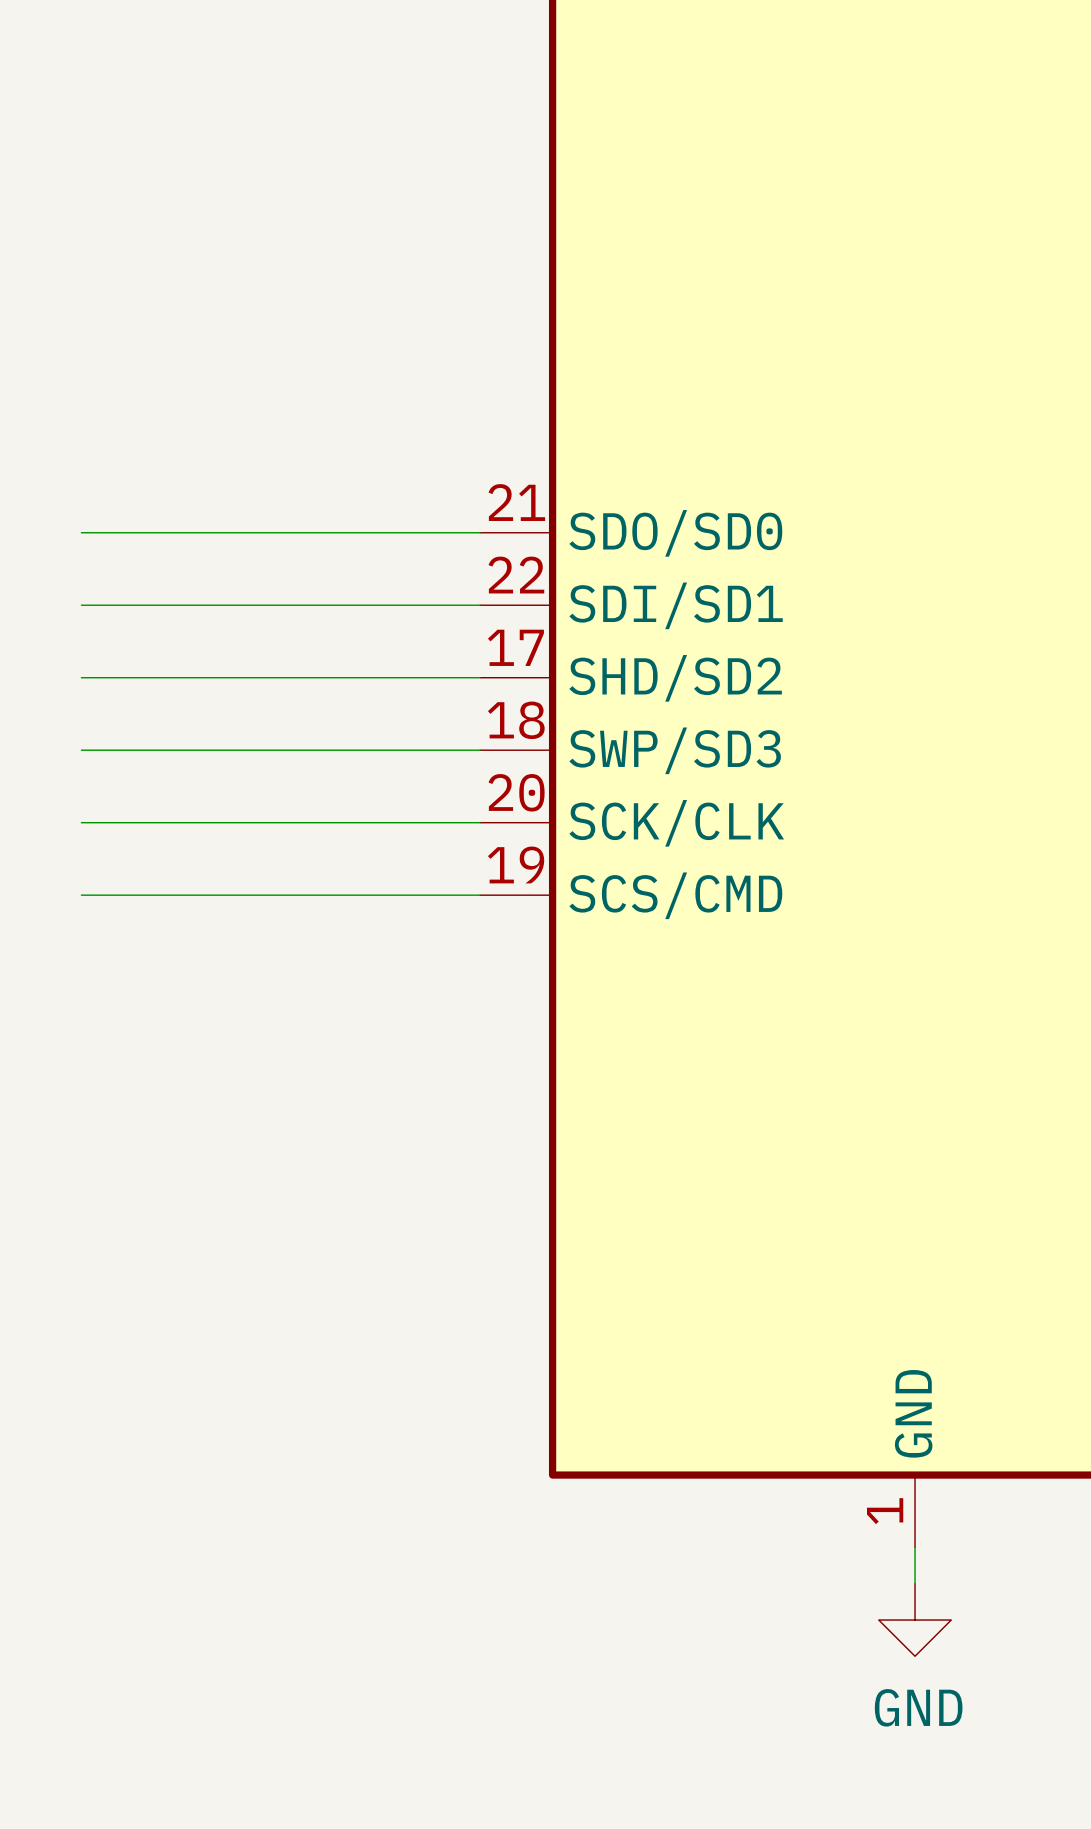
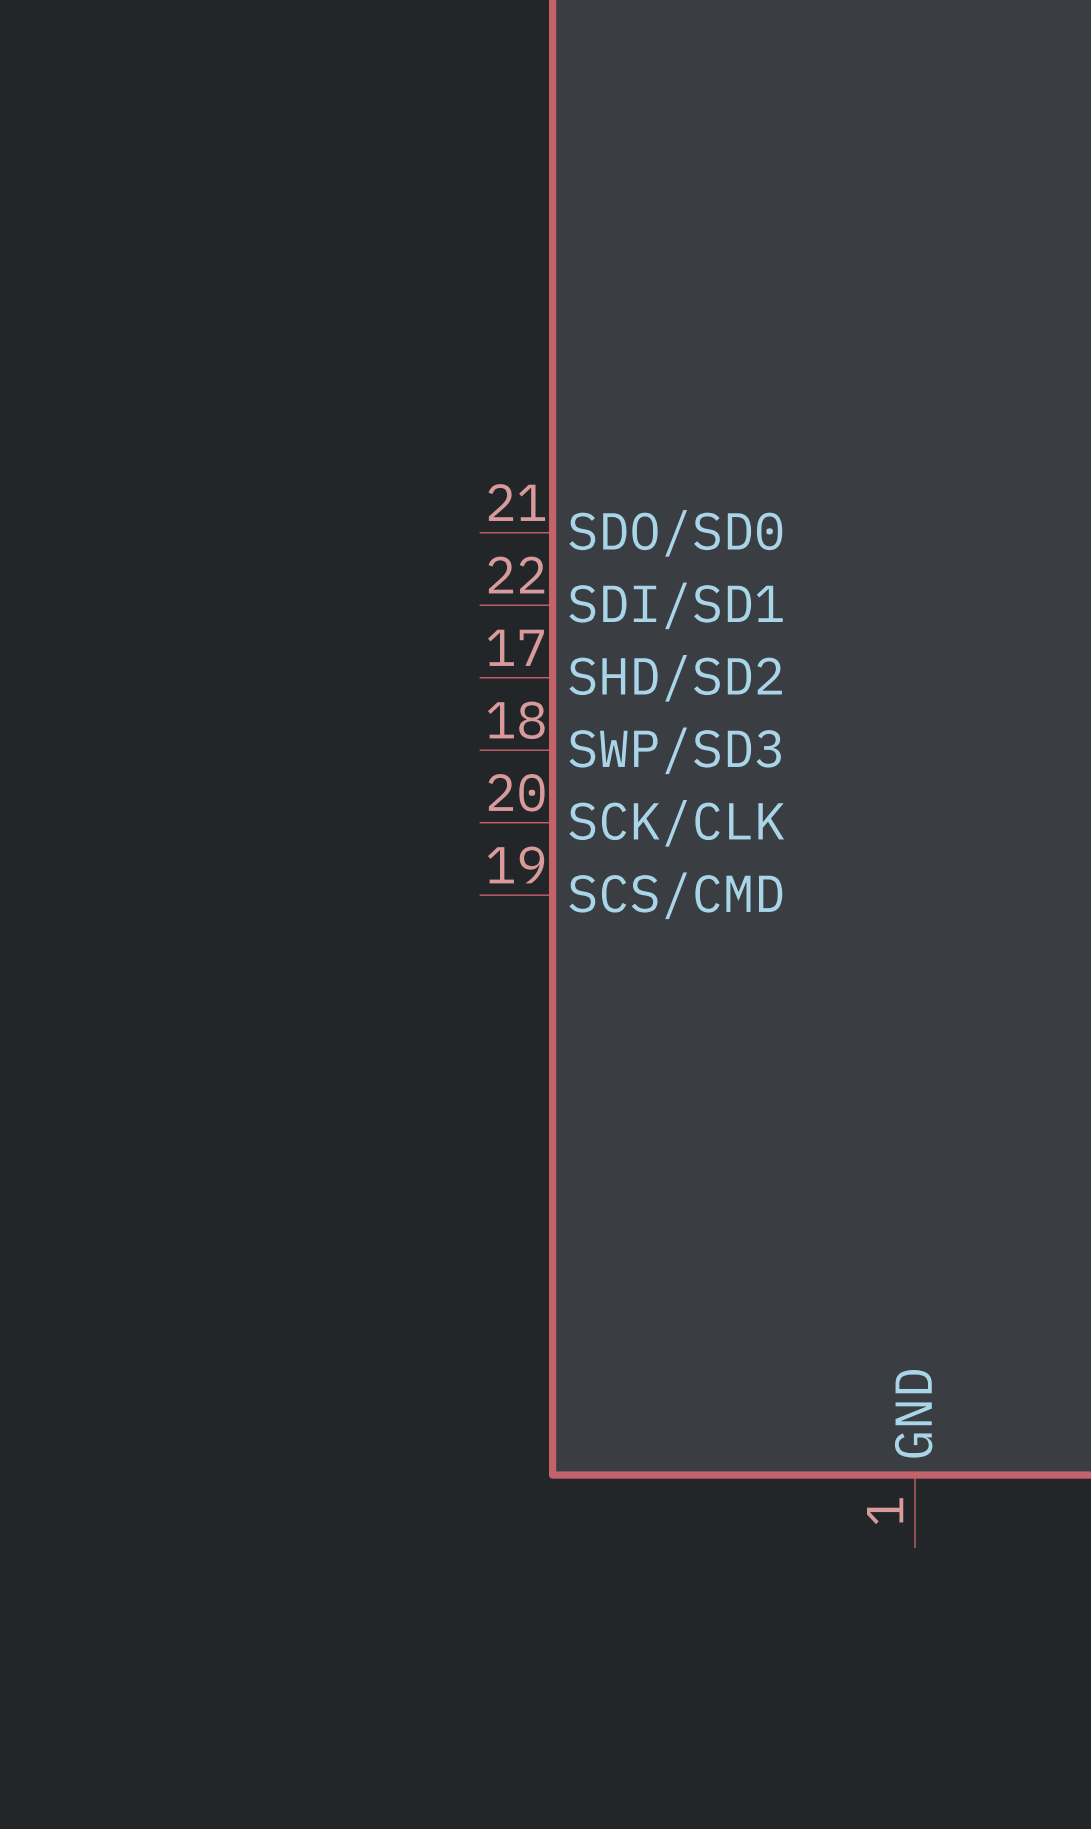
wire: (81, 532) (480, 532) -> none
wire: (81, 605) (480, 605) -> none
wire: (81, 677) (480, 677) -> none
wire: (81, 750) (480, 750) -> none
wire: (81, 822) (480, 822) -> none
wire: (81, 895) (480, 895) -> none
wire: (915, 1547) (915, 1583) -> none
power symbol: GND (915, 1620) -> none

